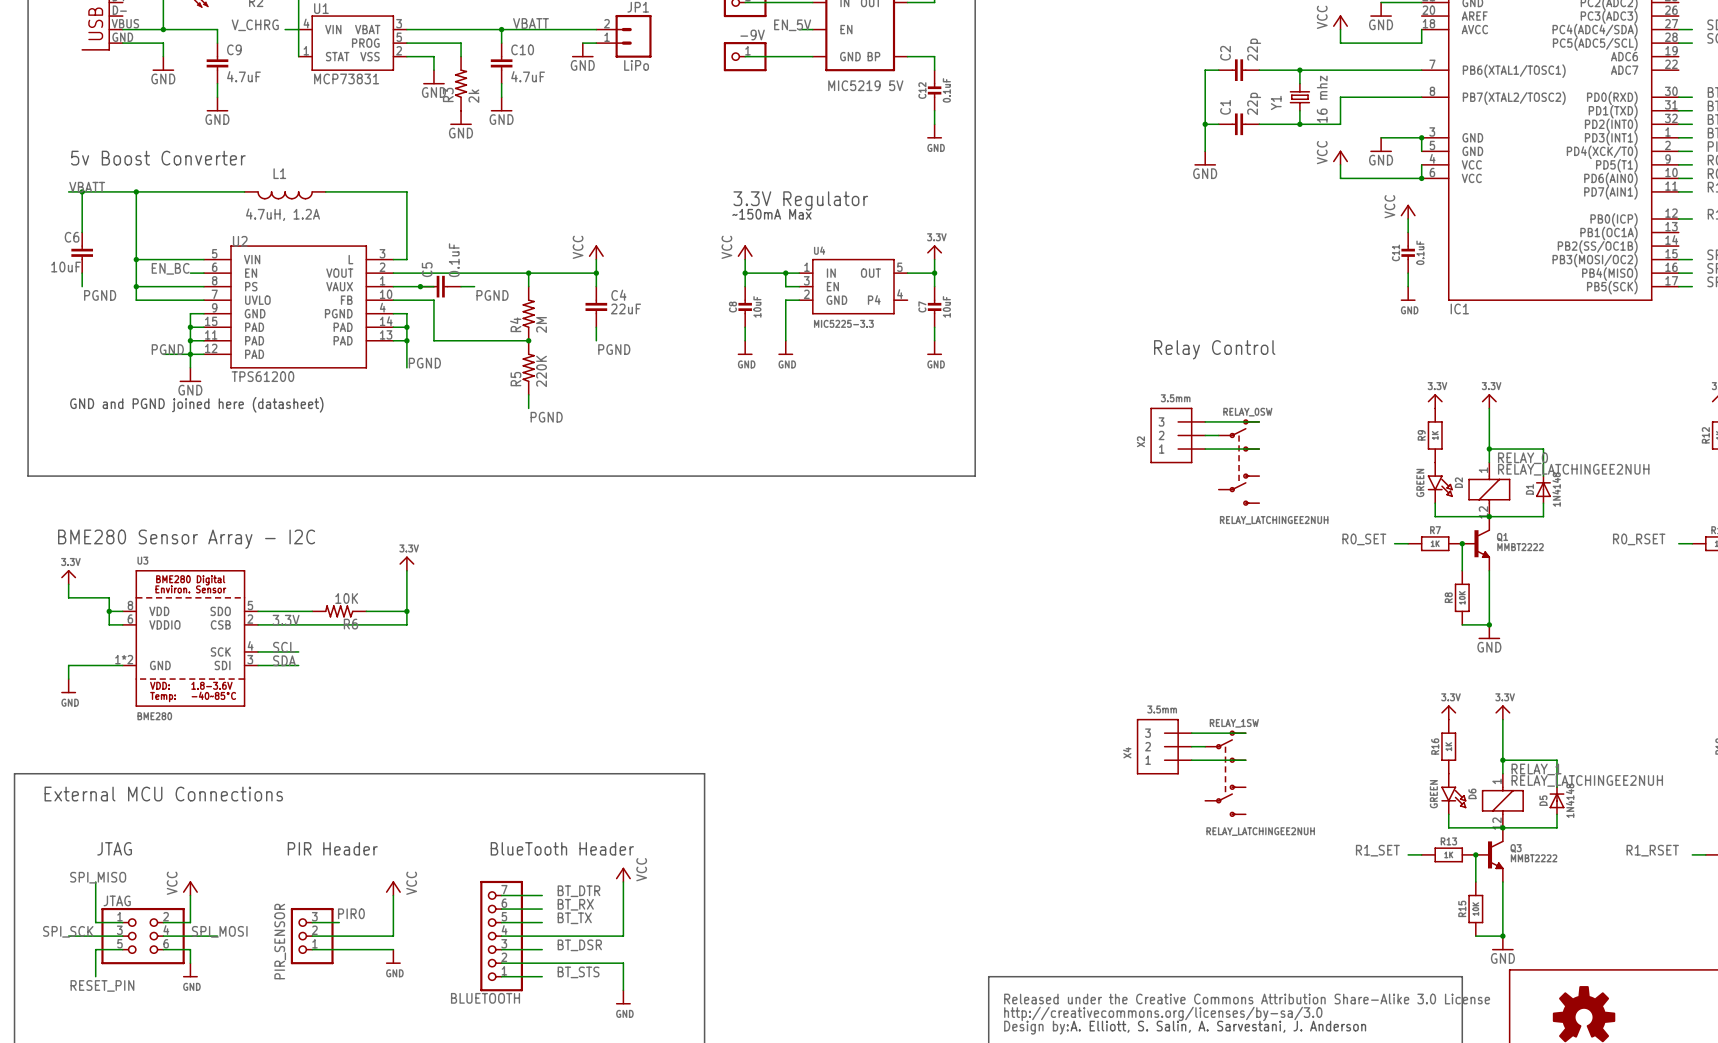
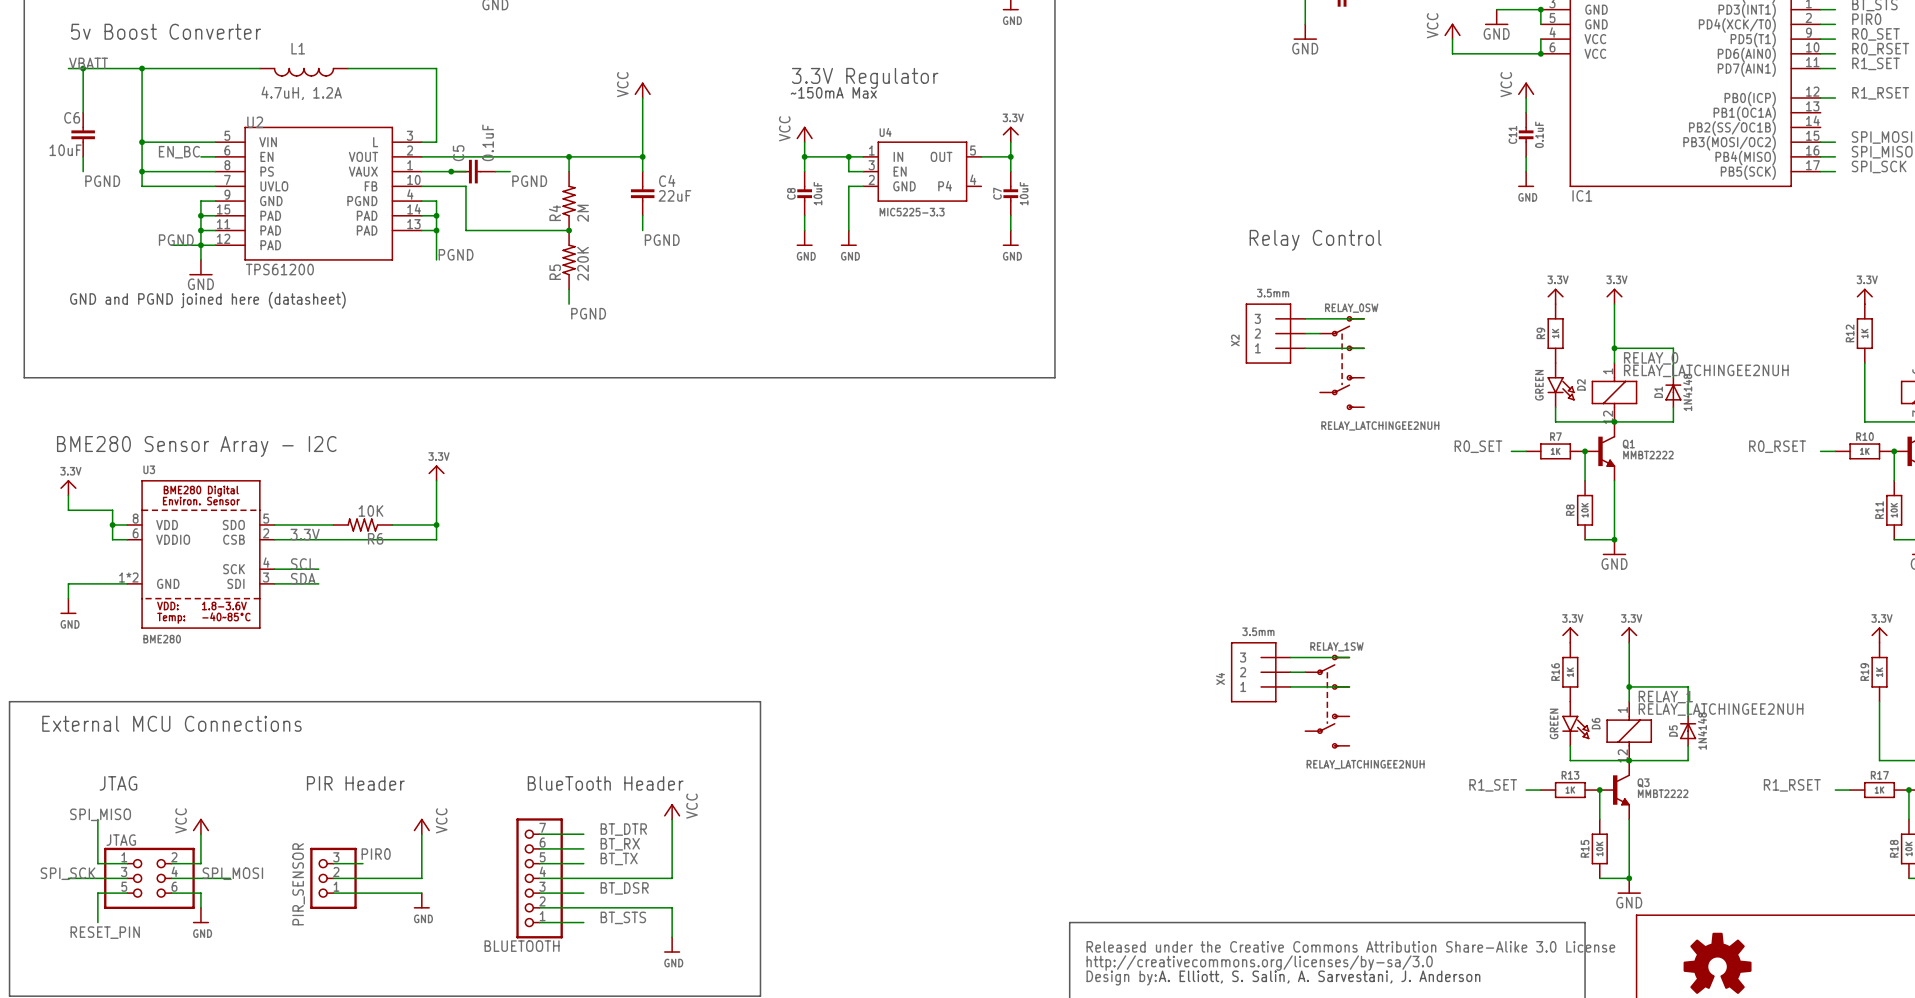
wire: none -> (642, 97) (642, 142)
power symbol position: VCC (596, 252) -> VCC (642, 90)

